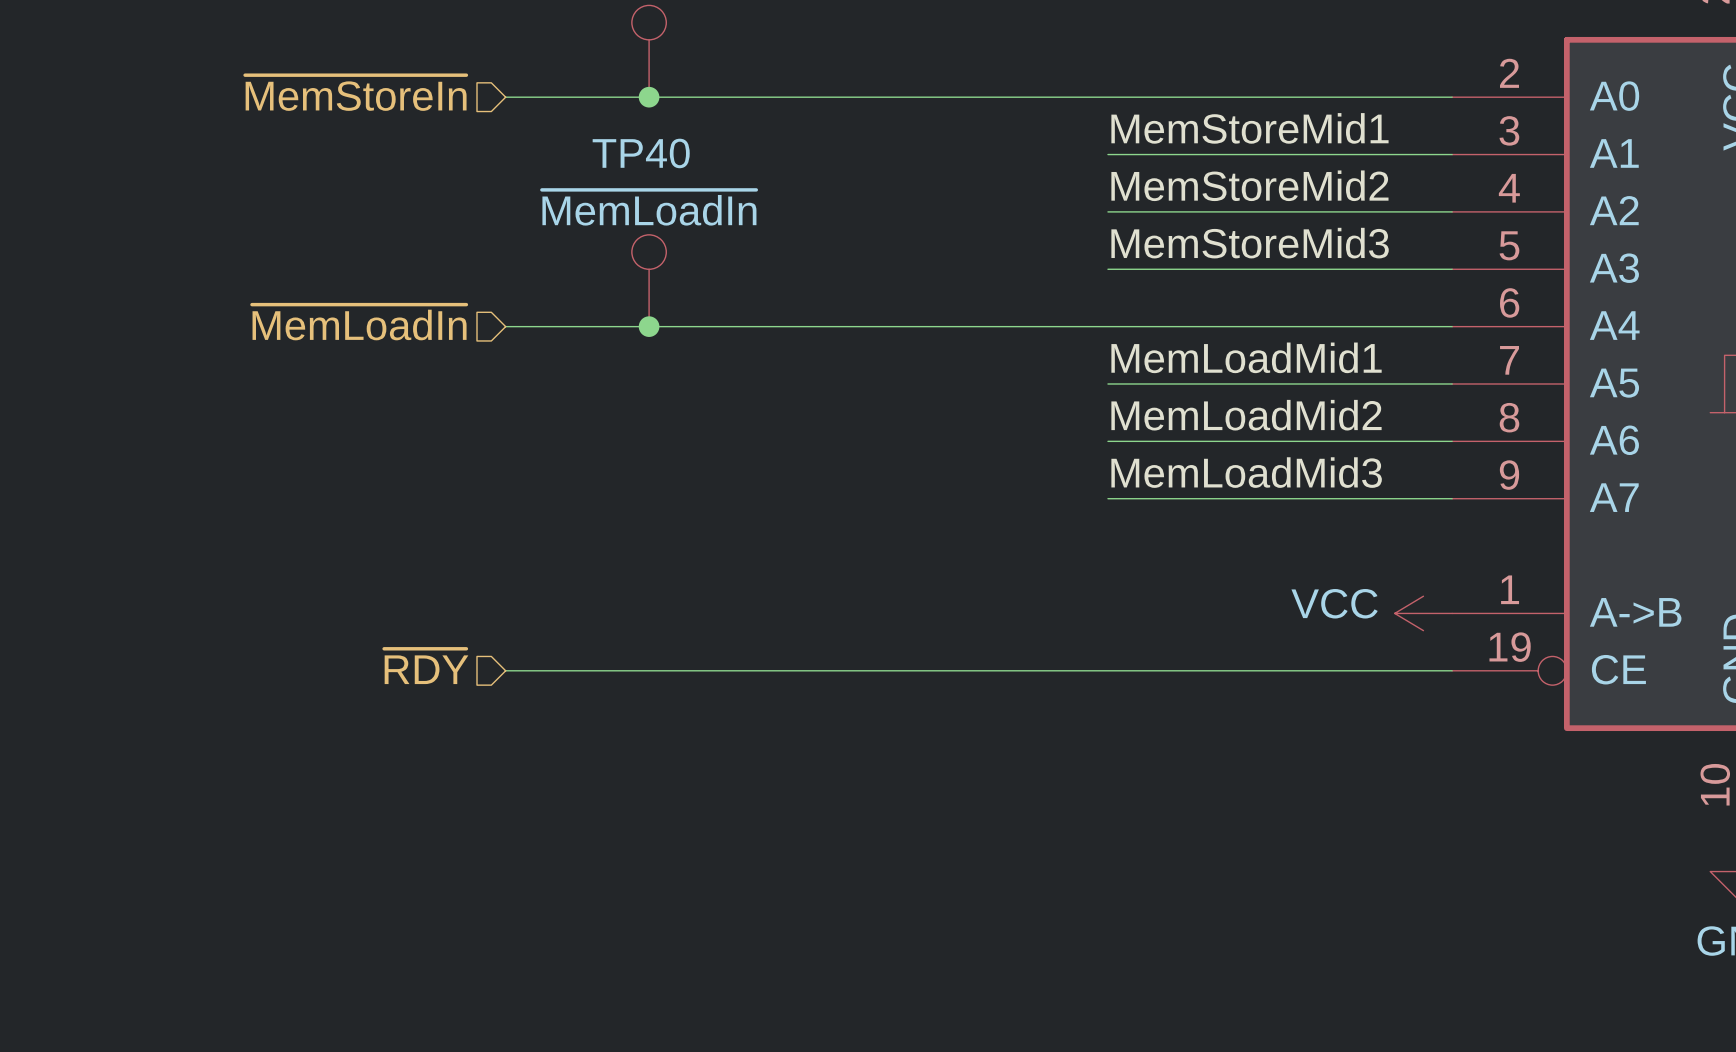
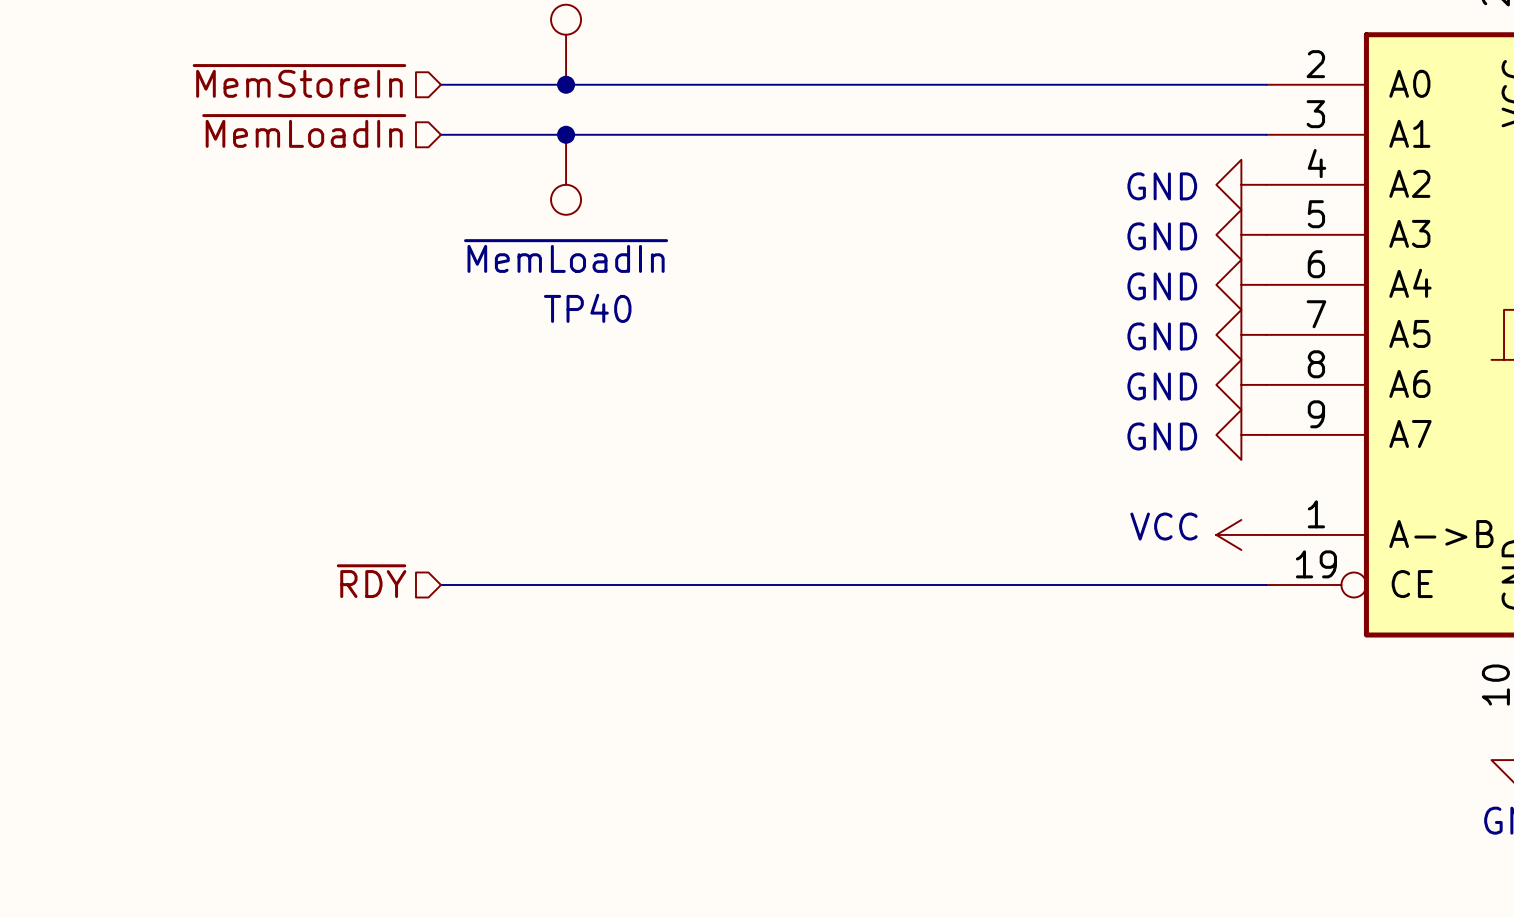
label: MemStoreMid1 (1249, 128) -> none
TP40 name position: TP40 (641, 153) -> TP40 (587, 308)
wire: none -> (441, 134) (966, 134)
junction: none -> (566, 134)
label: MemStoreMid2 (1249, 185) -> none
wire: (1107, 211) (1452, 211) -> none
power symbol: none -> GND (1241, 184)
label: MemStoreMid3 (1250, 243) -> none
TP40 rotation: 0° (649, 252) -> 180° (566, 199)
wire: (1107, 269) (1452, 269) -> none
power symbol: none -> GND (1241, 234)
TP40 position: (649, 280) -> (566, 174)
hierarchical label position: ~{MemLoadIn} (359, 322) -> ~{MemLoadIn} (304, 130)
wire: (505, 326) (1452, 326) -> none
junction: (649, 326) -> none
power symbol: none -> GND (1241, 284)
label: MemLoadMid1 (1246, 357) -> none
wire: (1107, 383) (1452, 383) -> none
power symbol: none -> GND (1241, 334)
label: MemLoadMid2 (1246, 415) -> none
wire: (1107, 441) (1452, 441) -> none
power symbol: none -> GND (1241, 384)
label: MemLoadMid3 (1246, 472) -> none
wire: (1107, 498) (1452, 498) -> none
power symbol: none -> GND (1241, 434)

